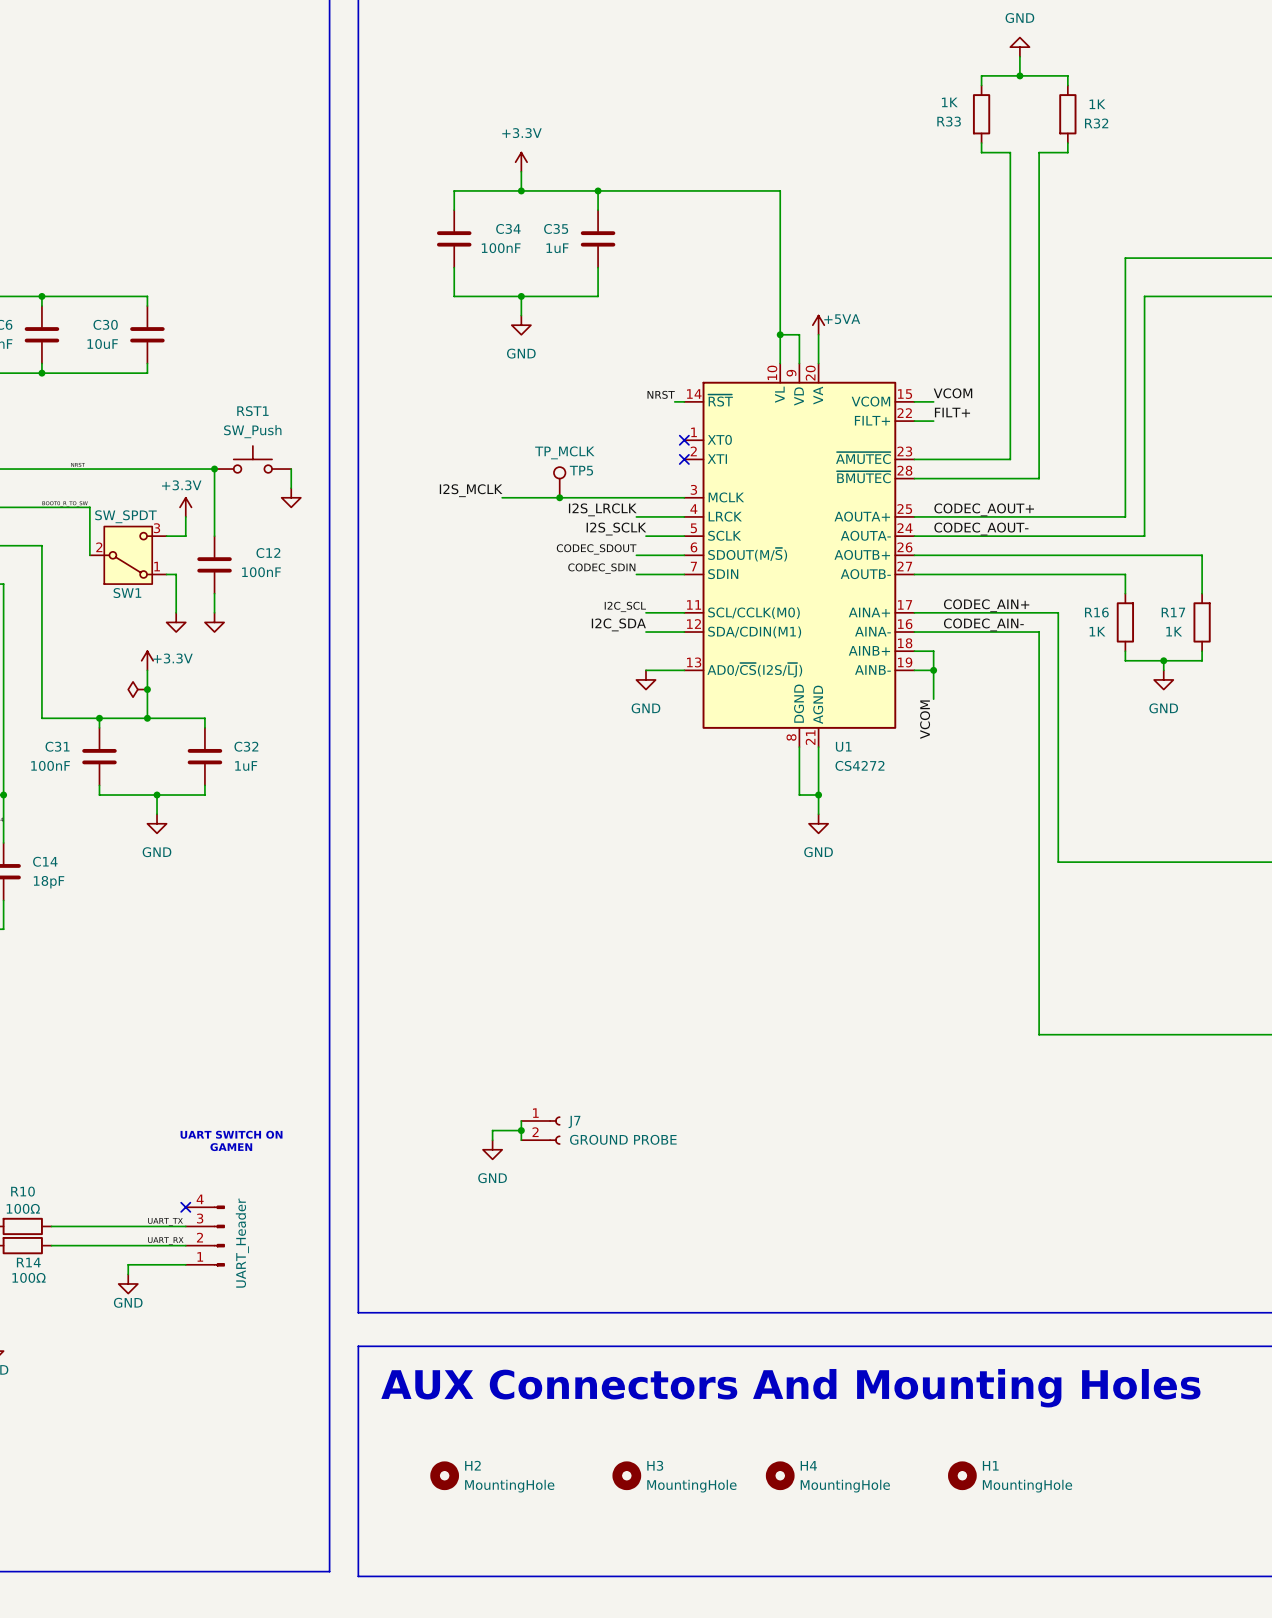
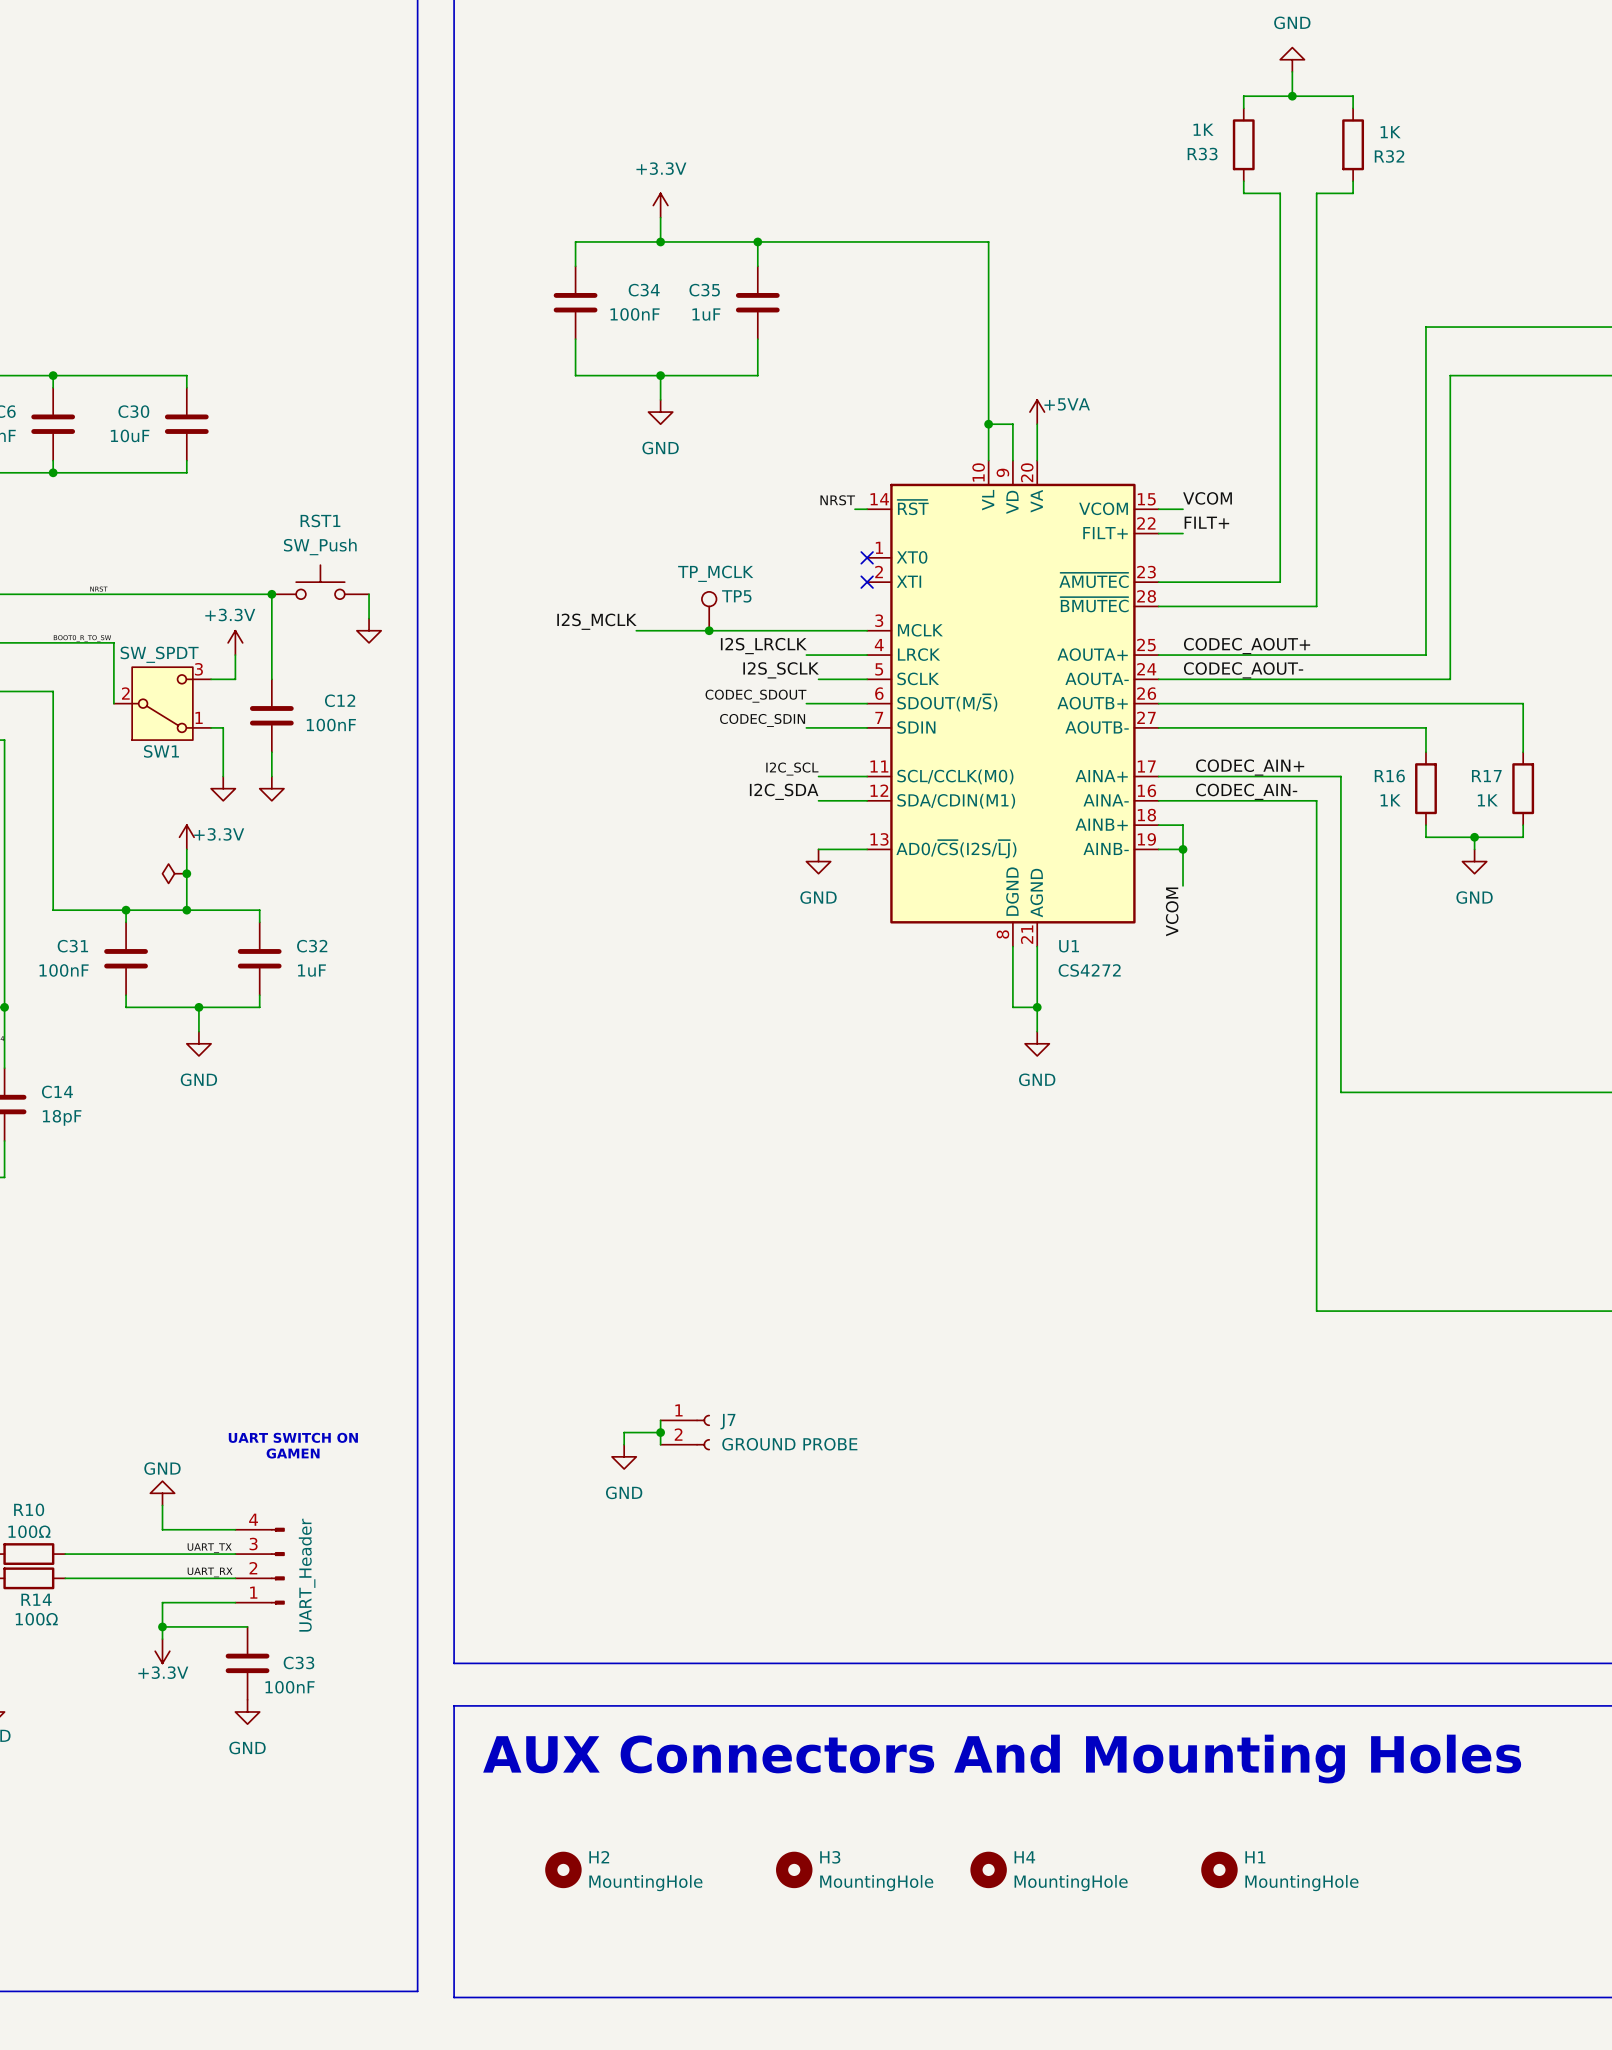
power symbol: none -> GND (162, 1493)
wire: none -> (162, 1505) (162, 1529) (235, 1529)
no-connect mark: (185, 1207) -> none
wire: none -> (162, 1626) (247, 1626)
power symbol: GND (128, 1283) -> none
junction: none -> (162, 1626)
power symbol: none -> +3.3V (162, 1651)
C33: none -> 100nF (247, 1663)
power symbol: none -> GND (247, 1711)

